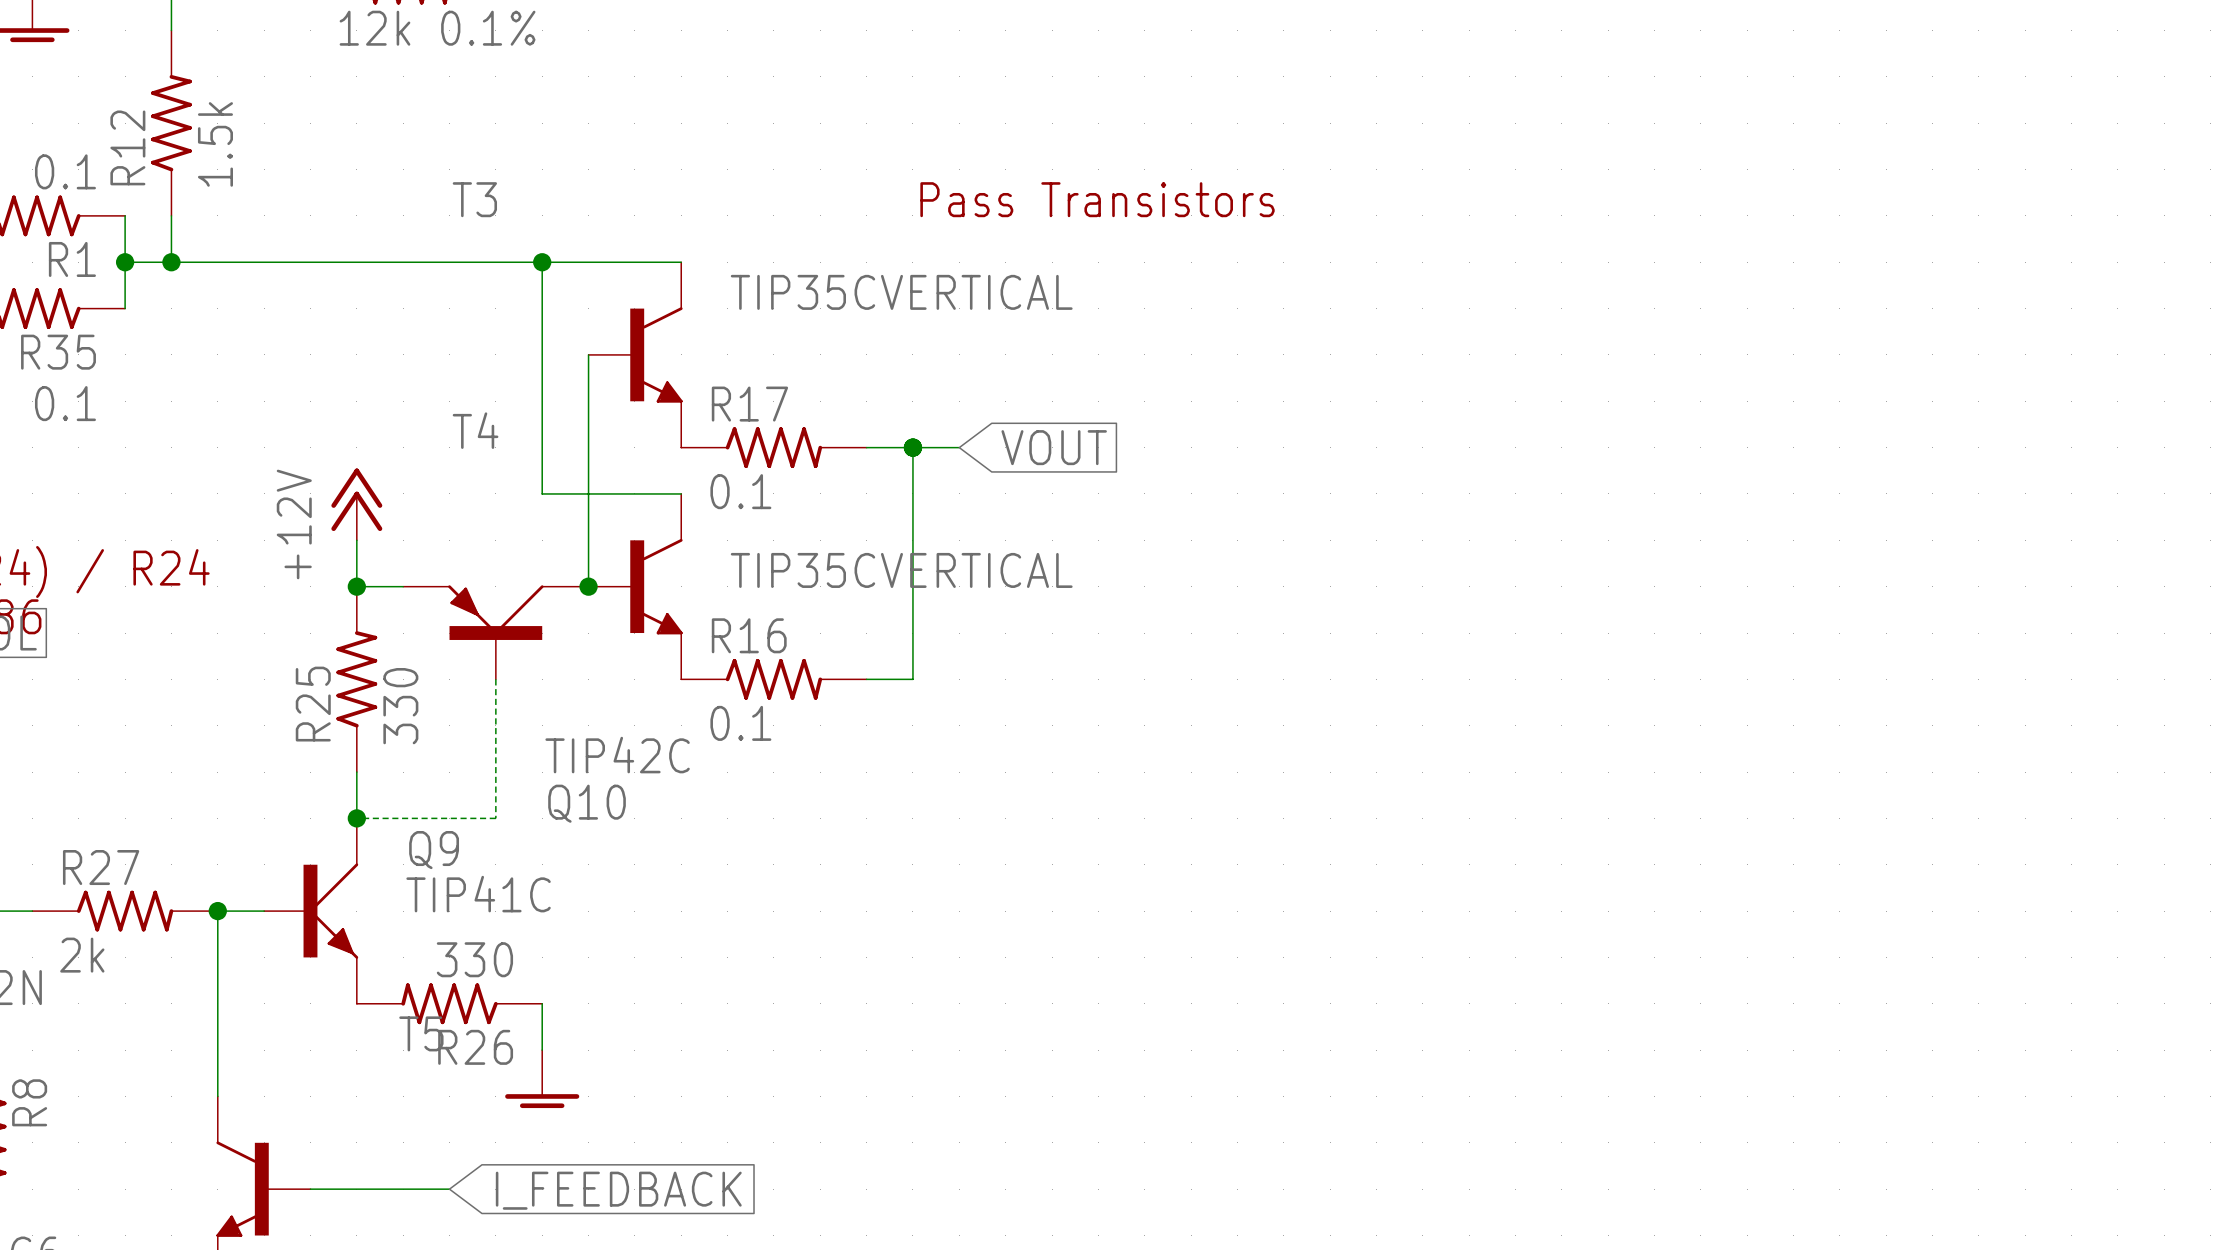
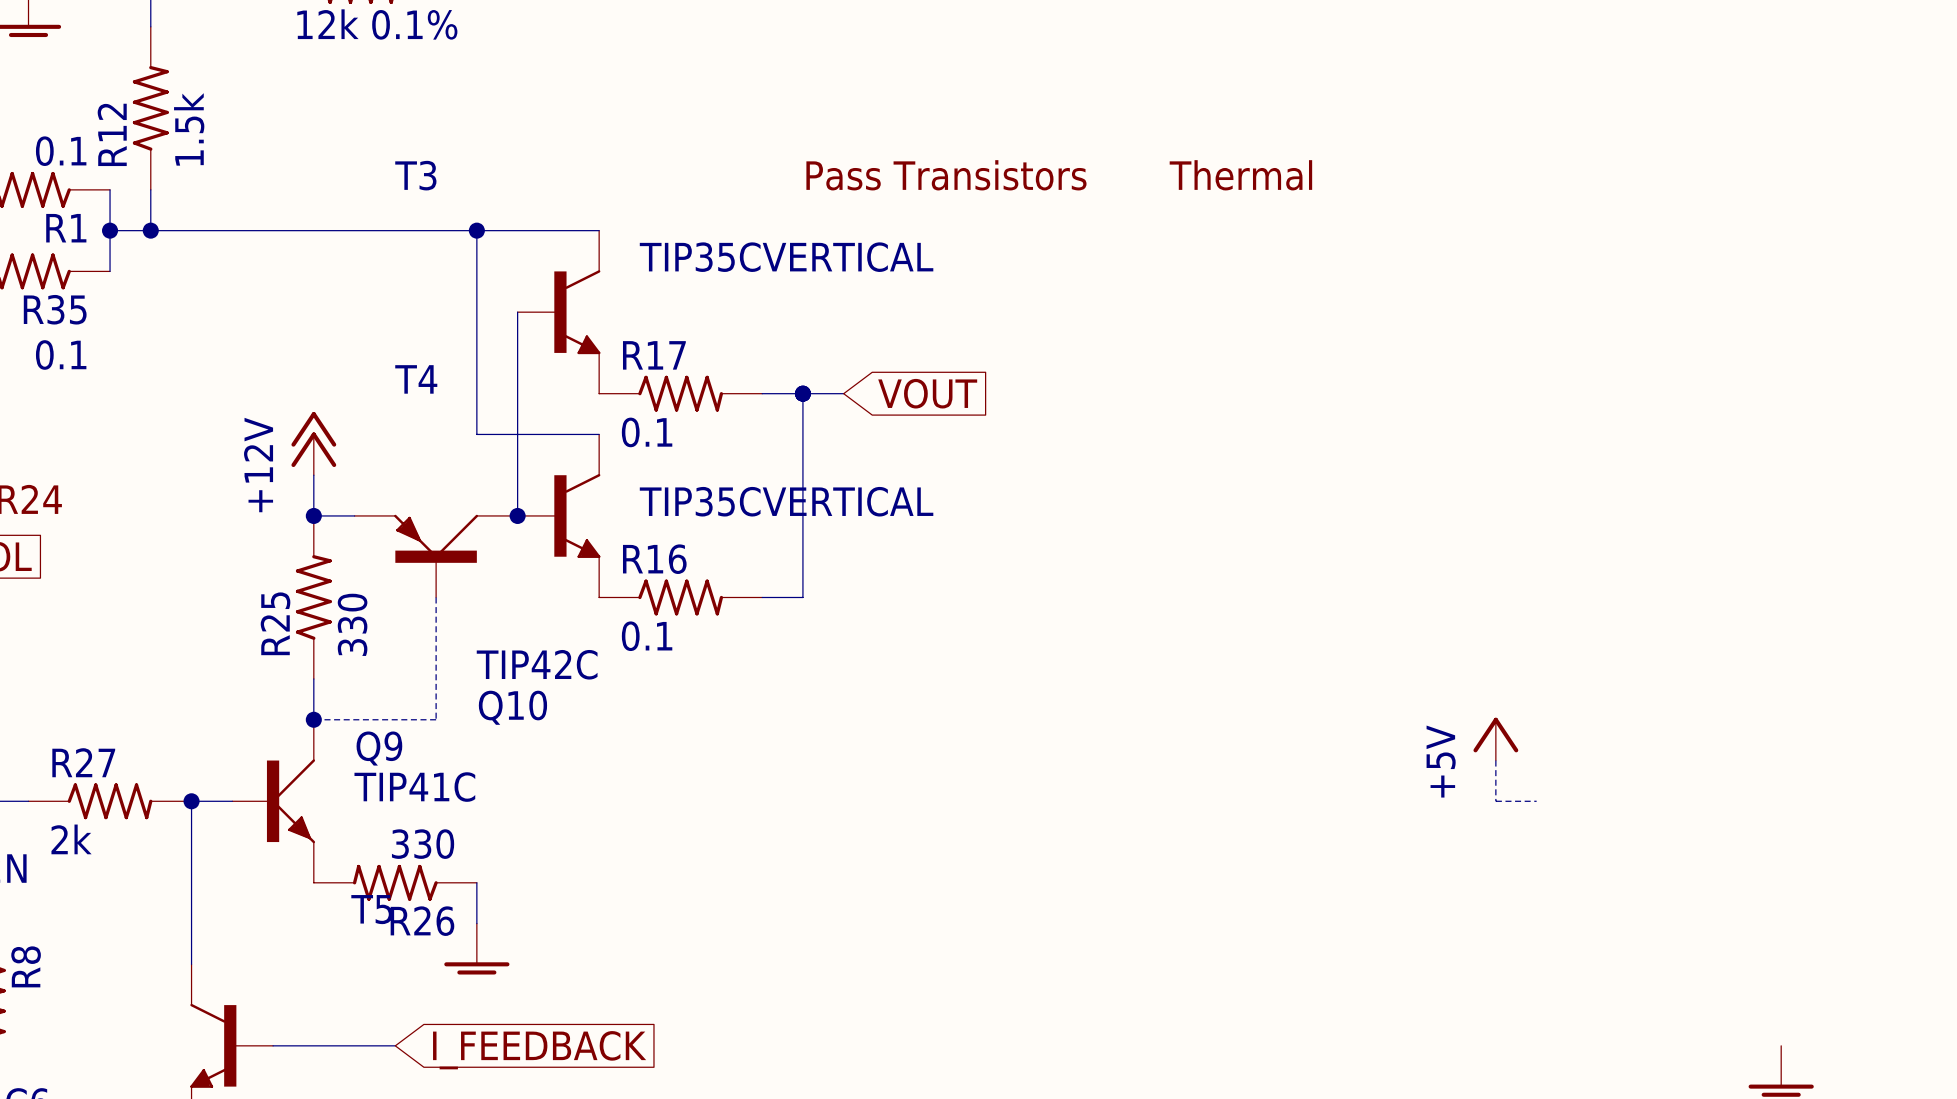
text: none -> Thermal (1240, 175)
power symbol: none -> +5V (1495, 739)
wire: none -> (1495, 760) (1495, 801) (1536, 801)
power symbol: none -> (1781, 1071)

